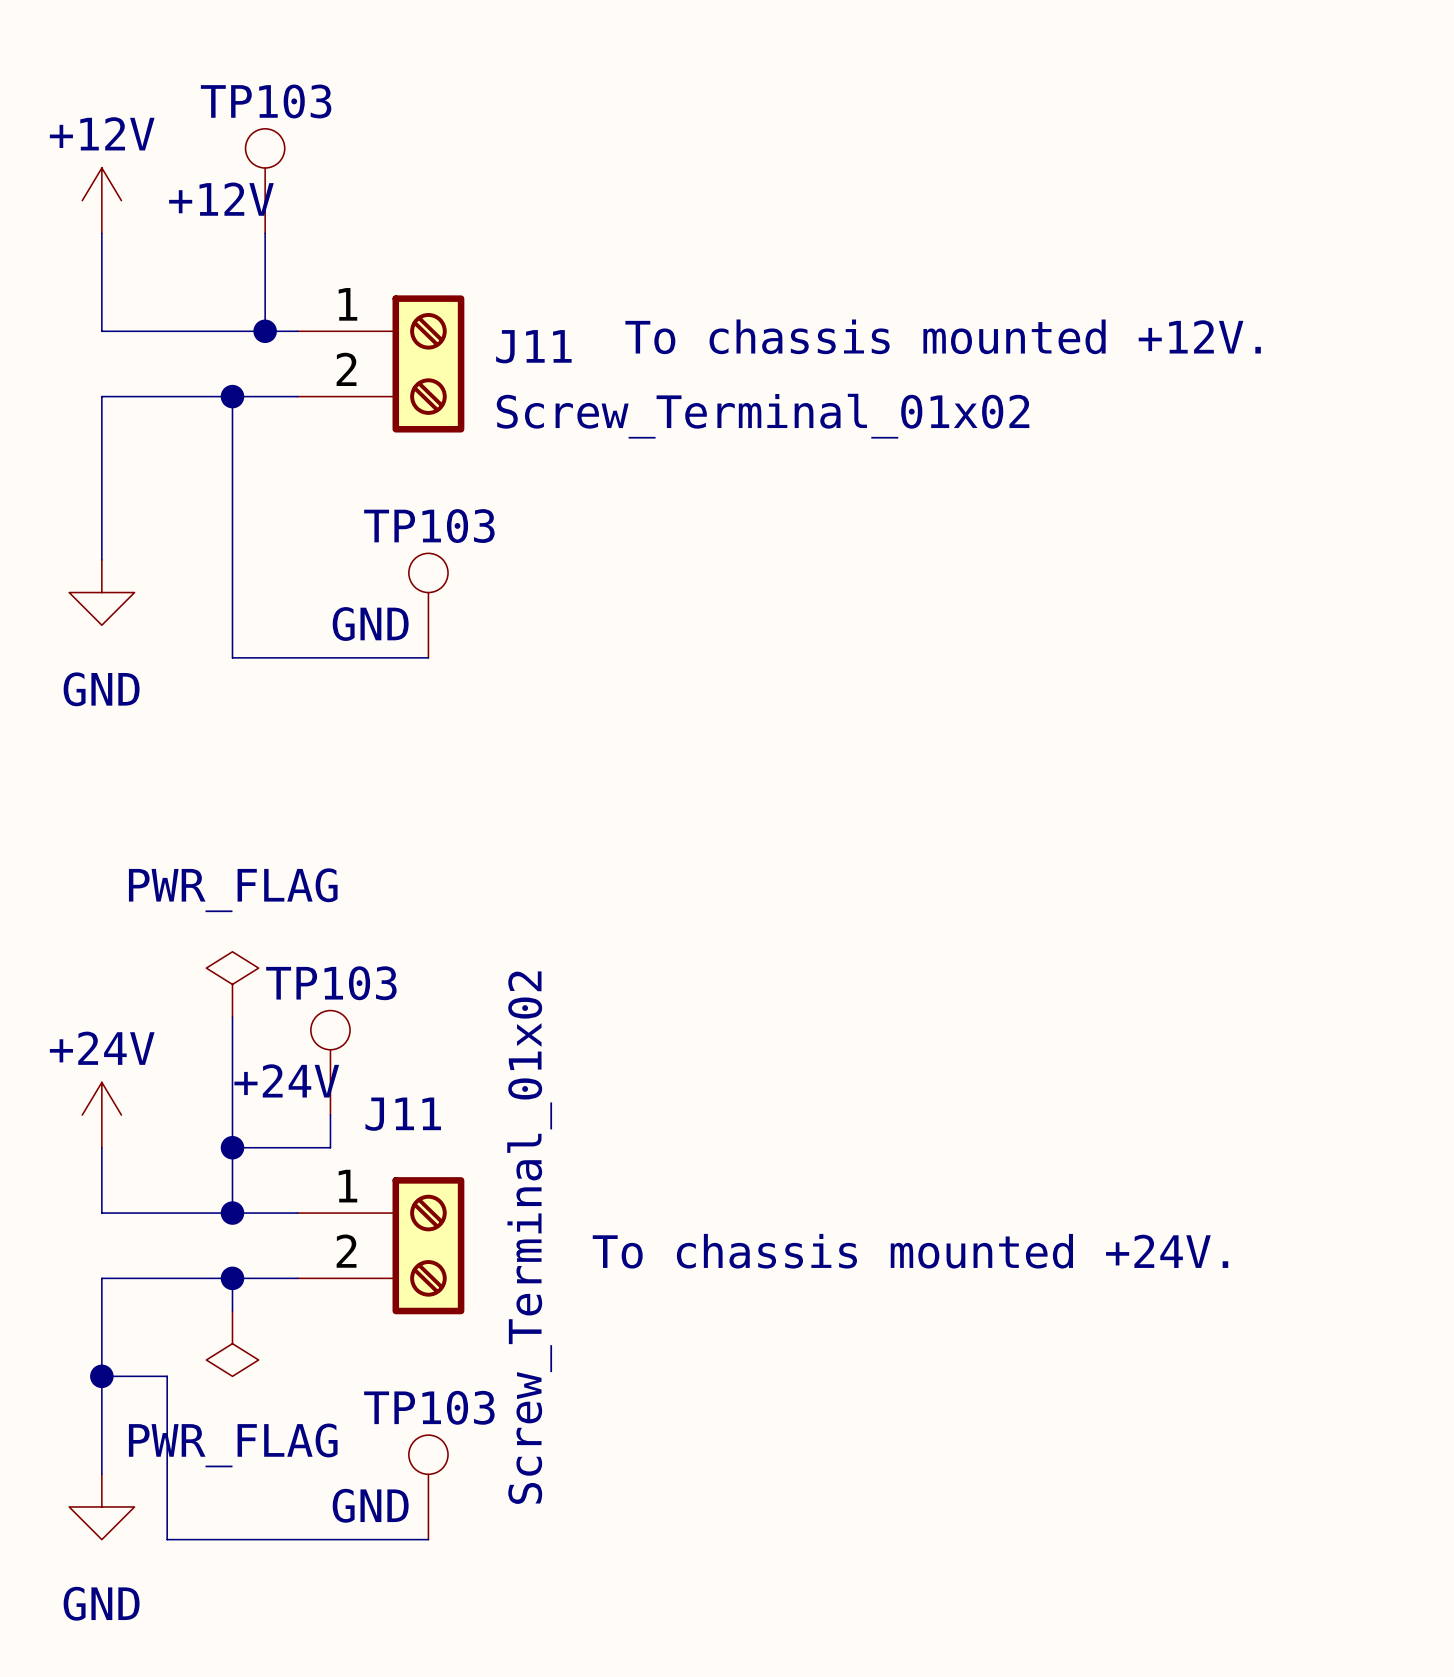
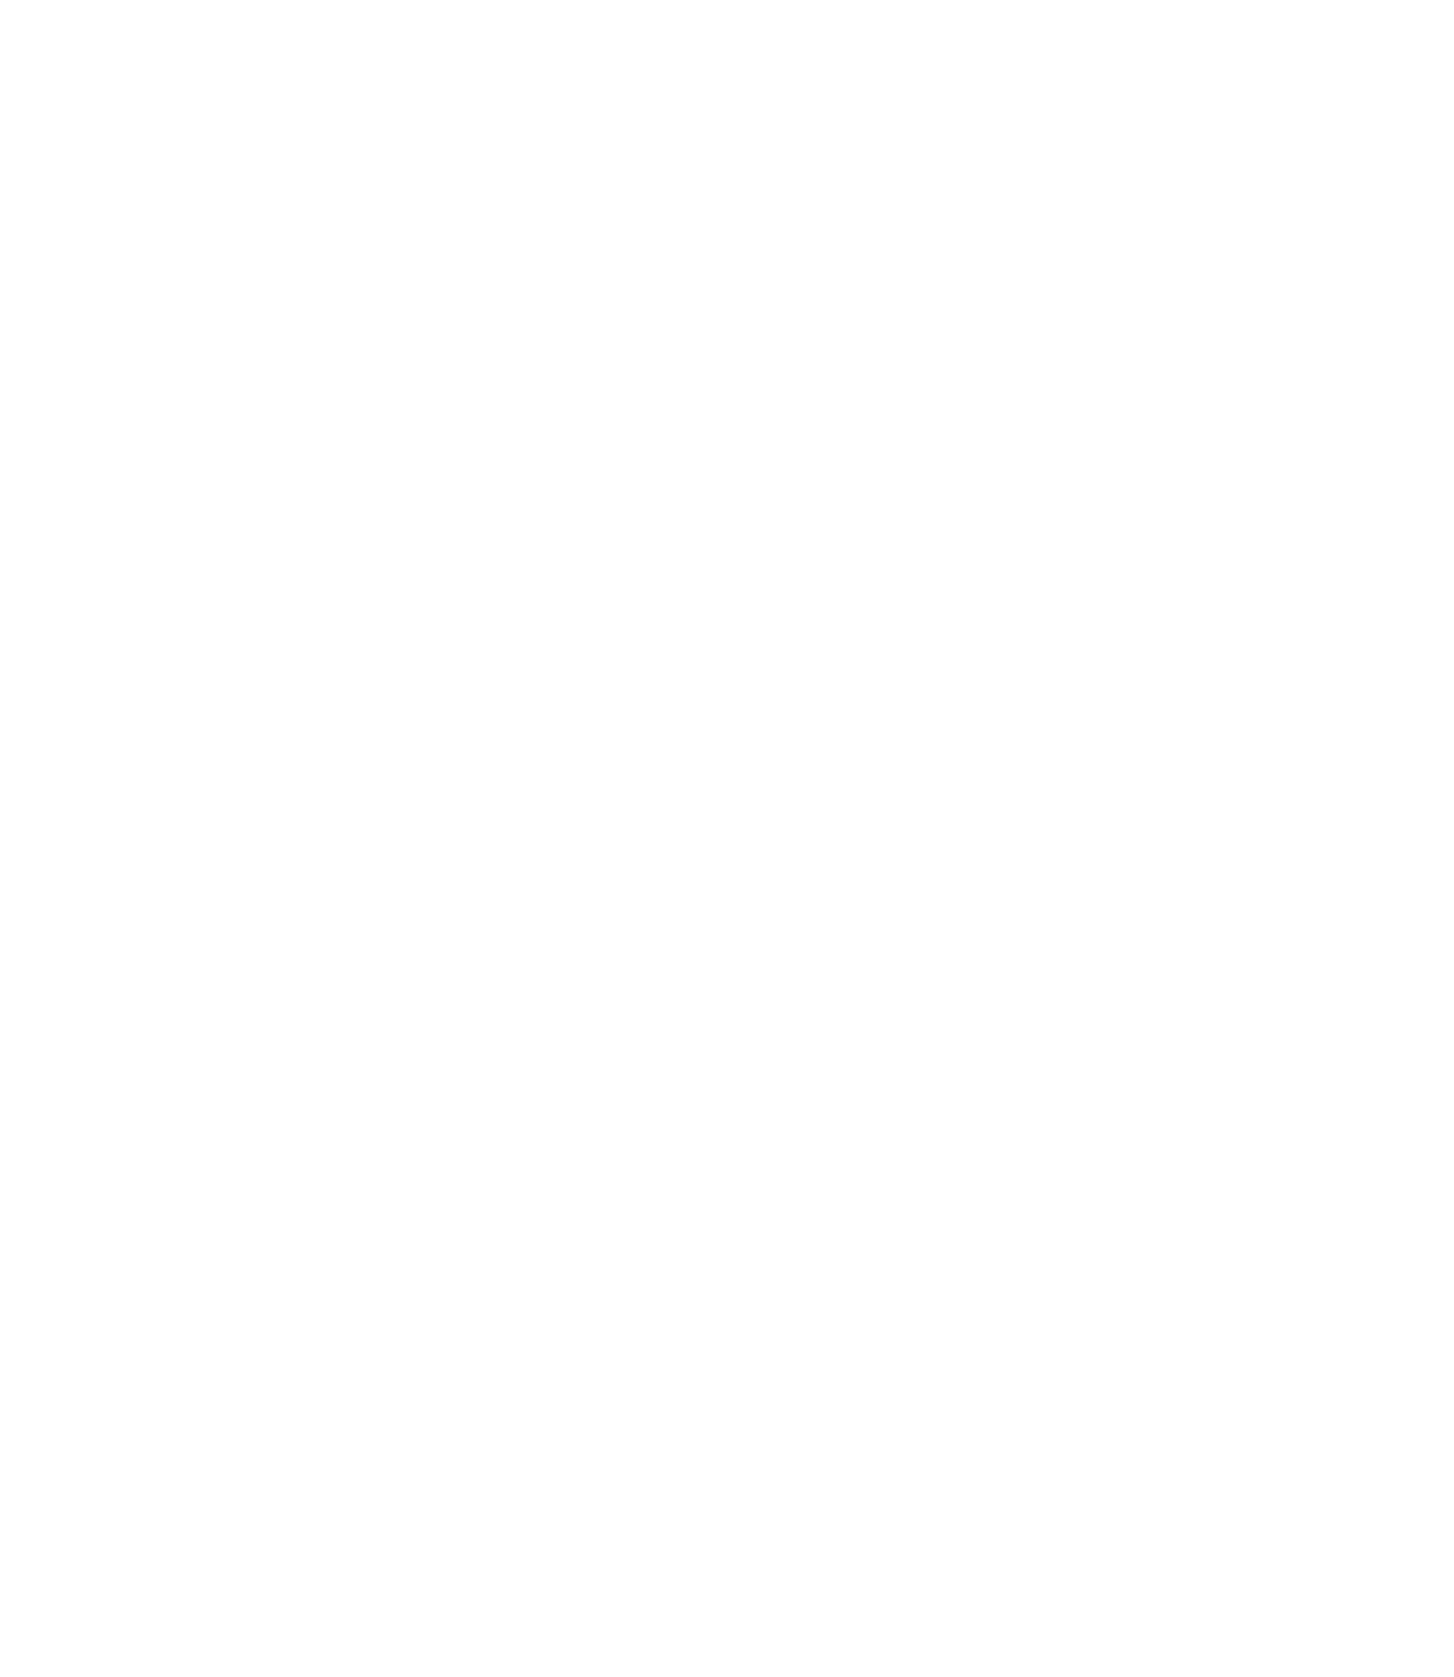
TP103: +12V (265, 181) -> none
power symbol: +12V (101, 200) -> none
wire: (101, 233) (101, 331) (297, 331) -> none
wire: (265, 233) (265, 331) -> none
junction: (265, 331) -> none
text: To chassis mounted +12V. (943, 336) -> none
J11: Screw_Terminal_01x02 (381, 363) -> none
wire: (232, 396) (232, 657) (428, 657) -> none
junction: (232, 396) -> none
wire: (297, 396) (101, 396) (101, 559) -> none
power symbol: GND (101, 592) -> none
TP103: GND (428, 605) -> none
power symbol: PWR_FLAG (232, 984) -> none
wire: (232, 1017) (232, 1213) -> none
TP103: +24V (330, 1062) -> none
power symbol: +24V (101, 1115) -> none
wire: (330, 1115) (330, 1147) (232, 1147) -> none
wire: (101, 1147) (101, 1213) (297, 1213) -> none
junction: (232, 1147) -> none
junction: (232, 1213) -> none
J11: Screw_Terminal_01x02 (381, 1245) -> none
text: To chassis mounted +24V. (910, 1251) -> none
wire: (232, 1278) (232, 1311) -> none
junction: (232, 1278) -> none
wire: (297, 1278) (101, 1278) (101, 1474) -> none
power symbol: PWR_FLAG (232, 1343) -> none
wire: (101, 1376) (167, 1376) (167, 1539) (428, 1539) -> none
junction: (101, 1376) -> none
TP103: GND (428, 1487) -> none
power symbol: GND (101, 1506) -> none

